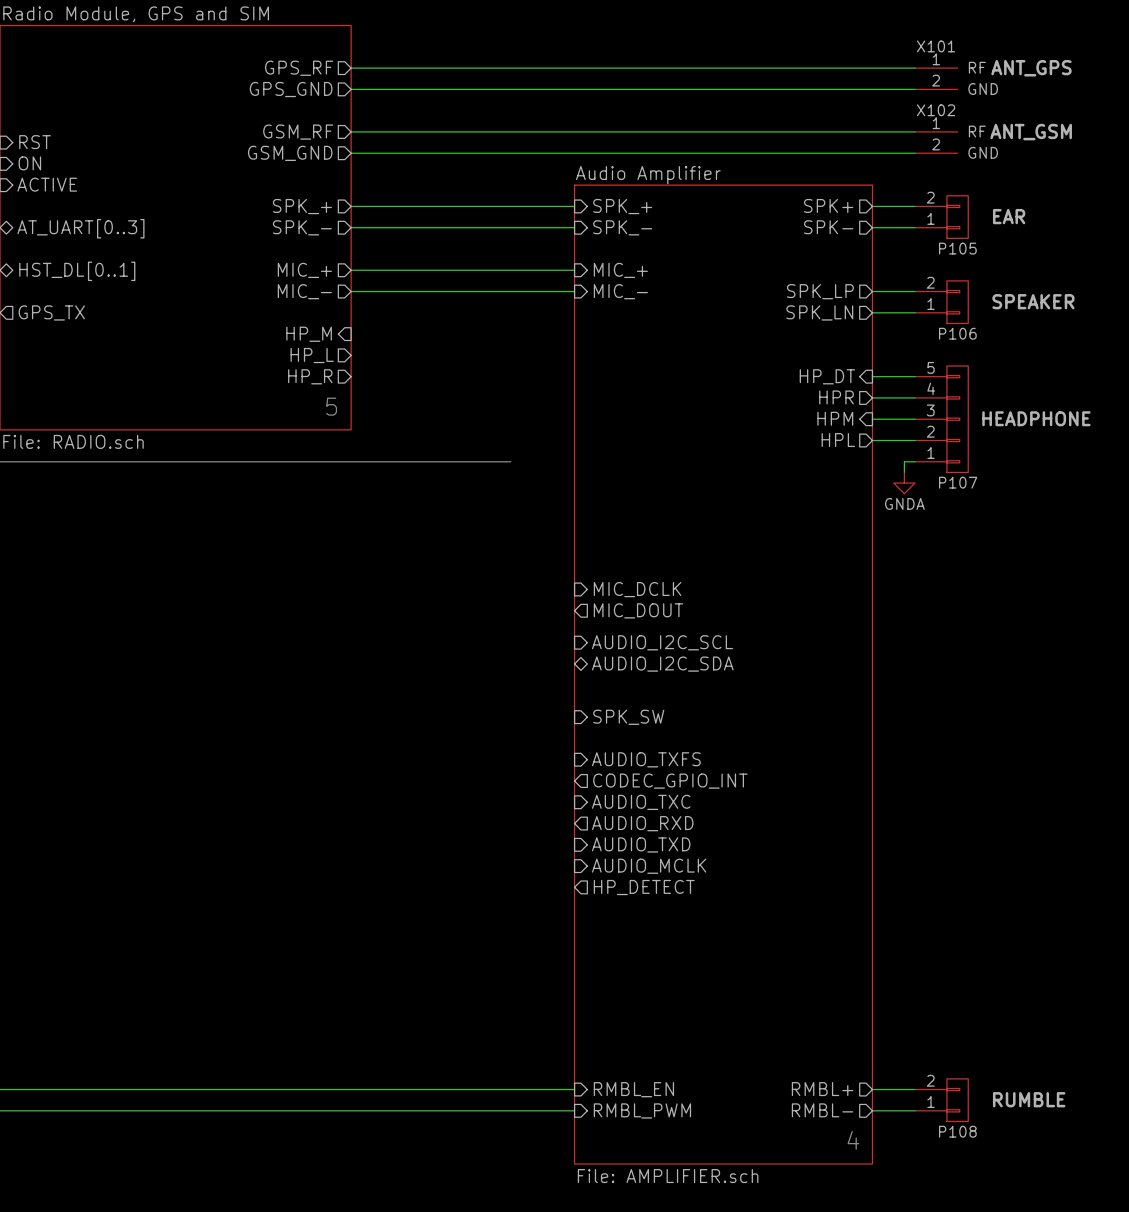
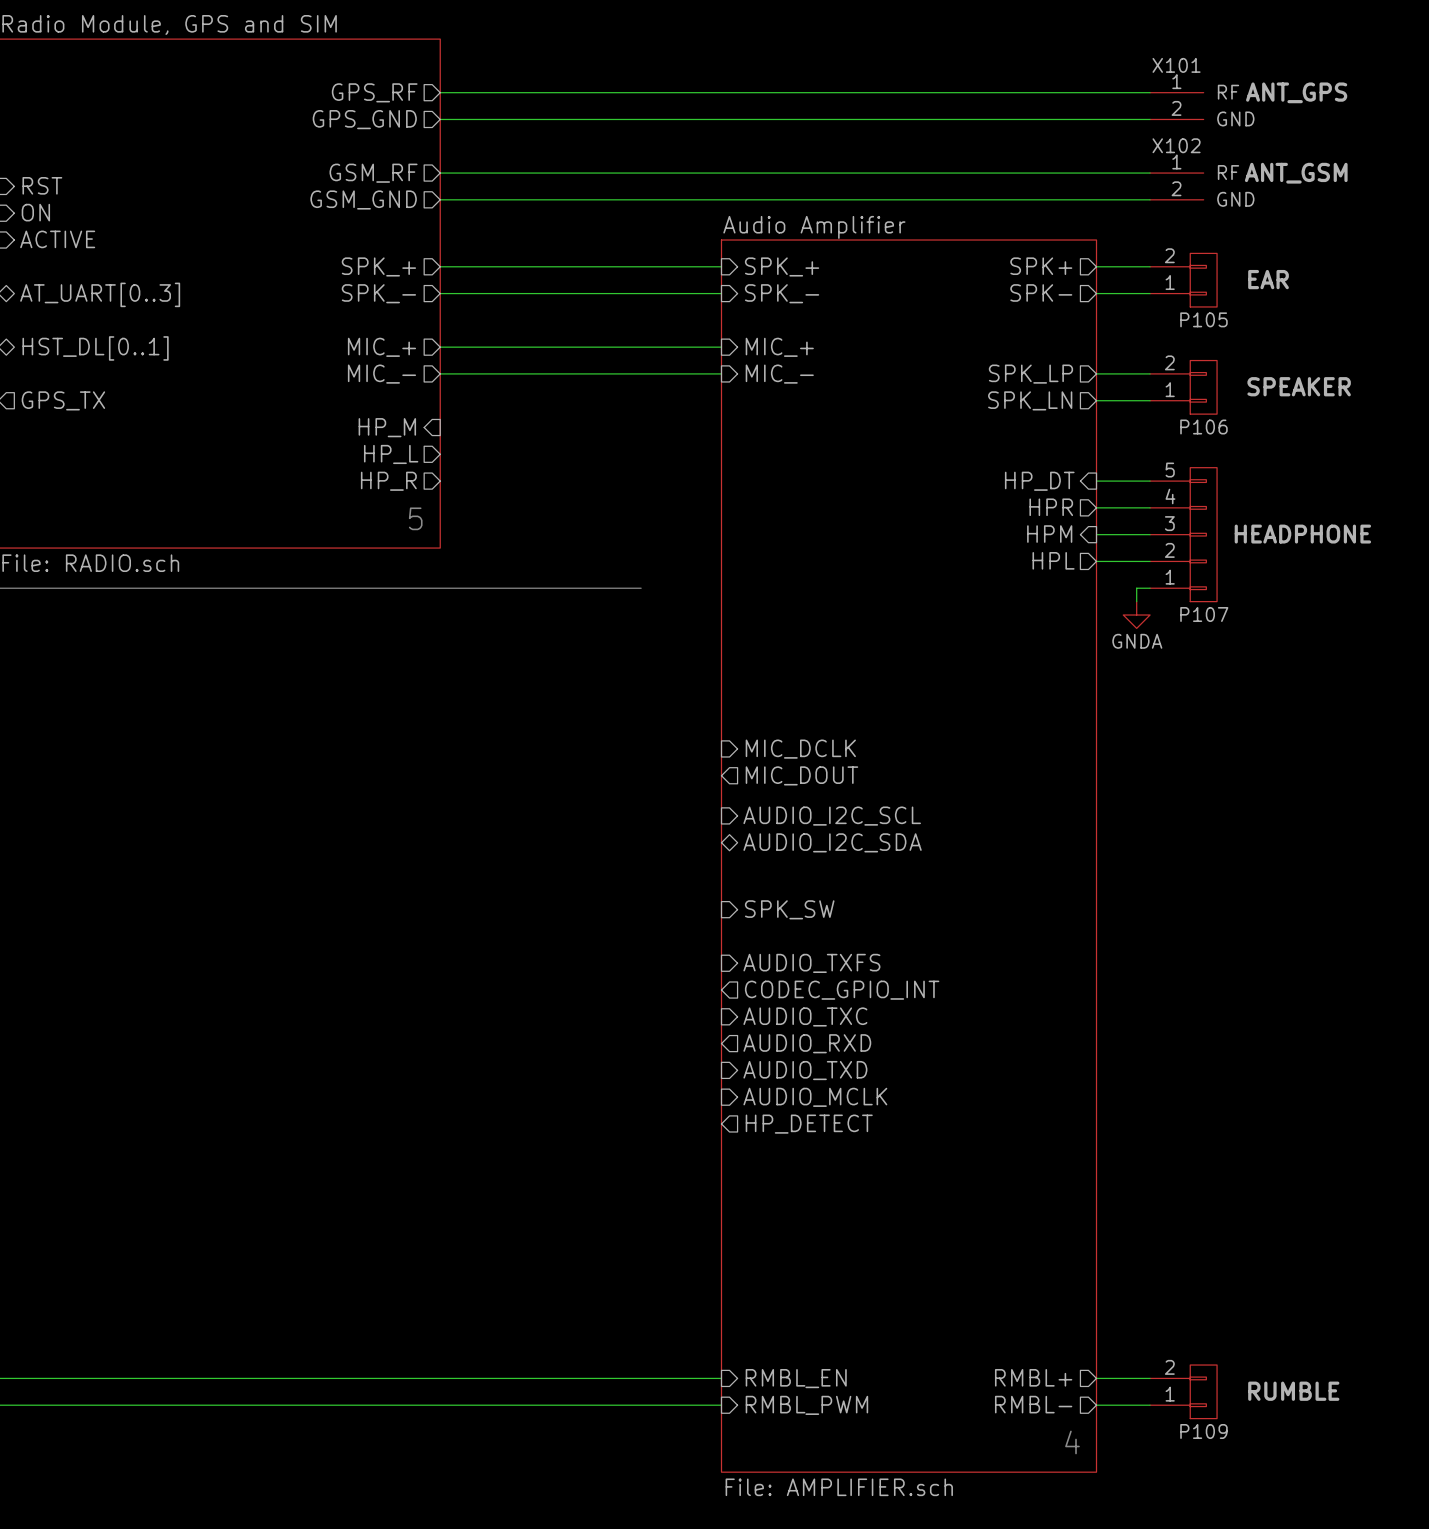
P108 name: P108 (957, 1131) -> P109 (1203, 1431)

